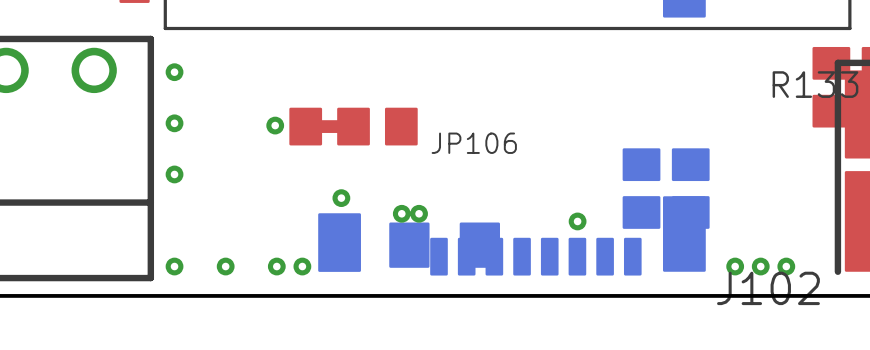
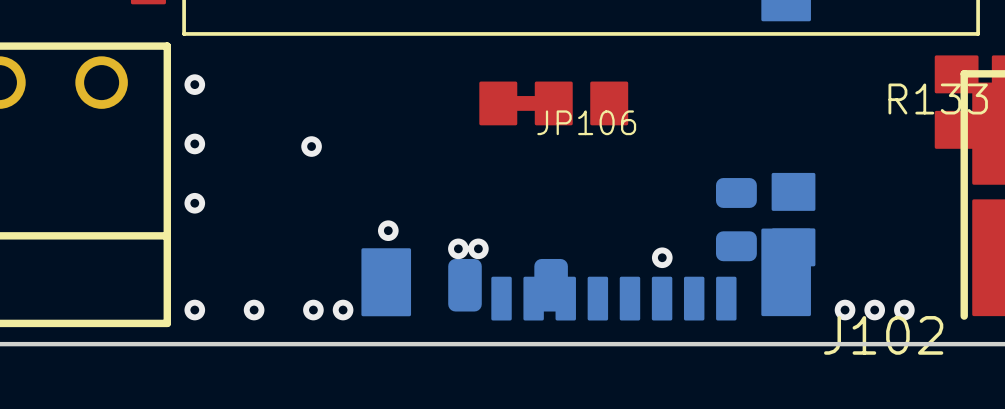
JP106 position: (353, 126) -> (553, 103)
JP106 name position: JP106 (474, 143) -> JP106 (586, 122)
part footprint: [622, 148, 661, 229] -> [715, 178, 757, 262]
part footprint: [389, 222, 500, 268] -> [448, 258, 568, 312]

